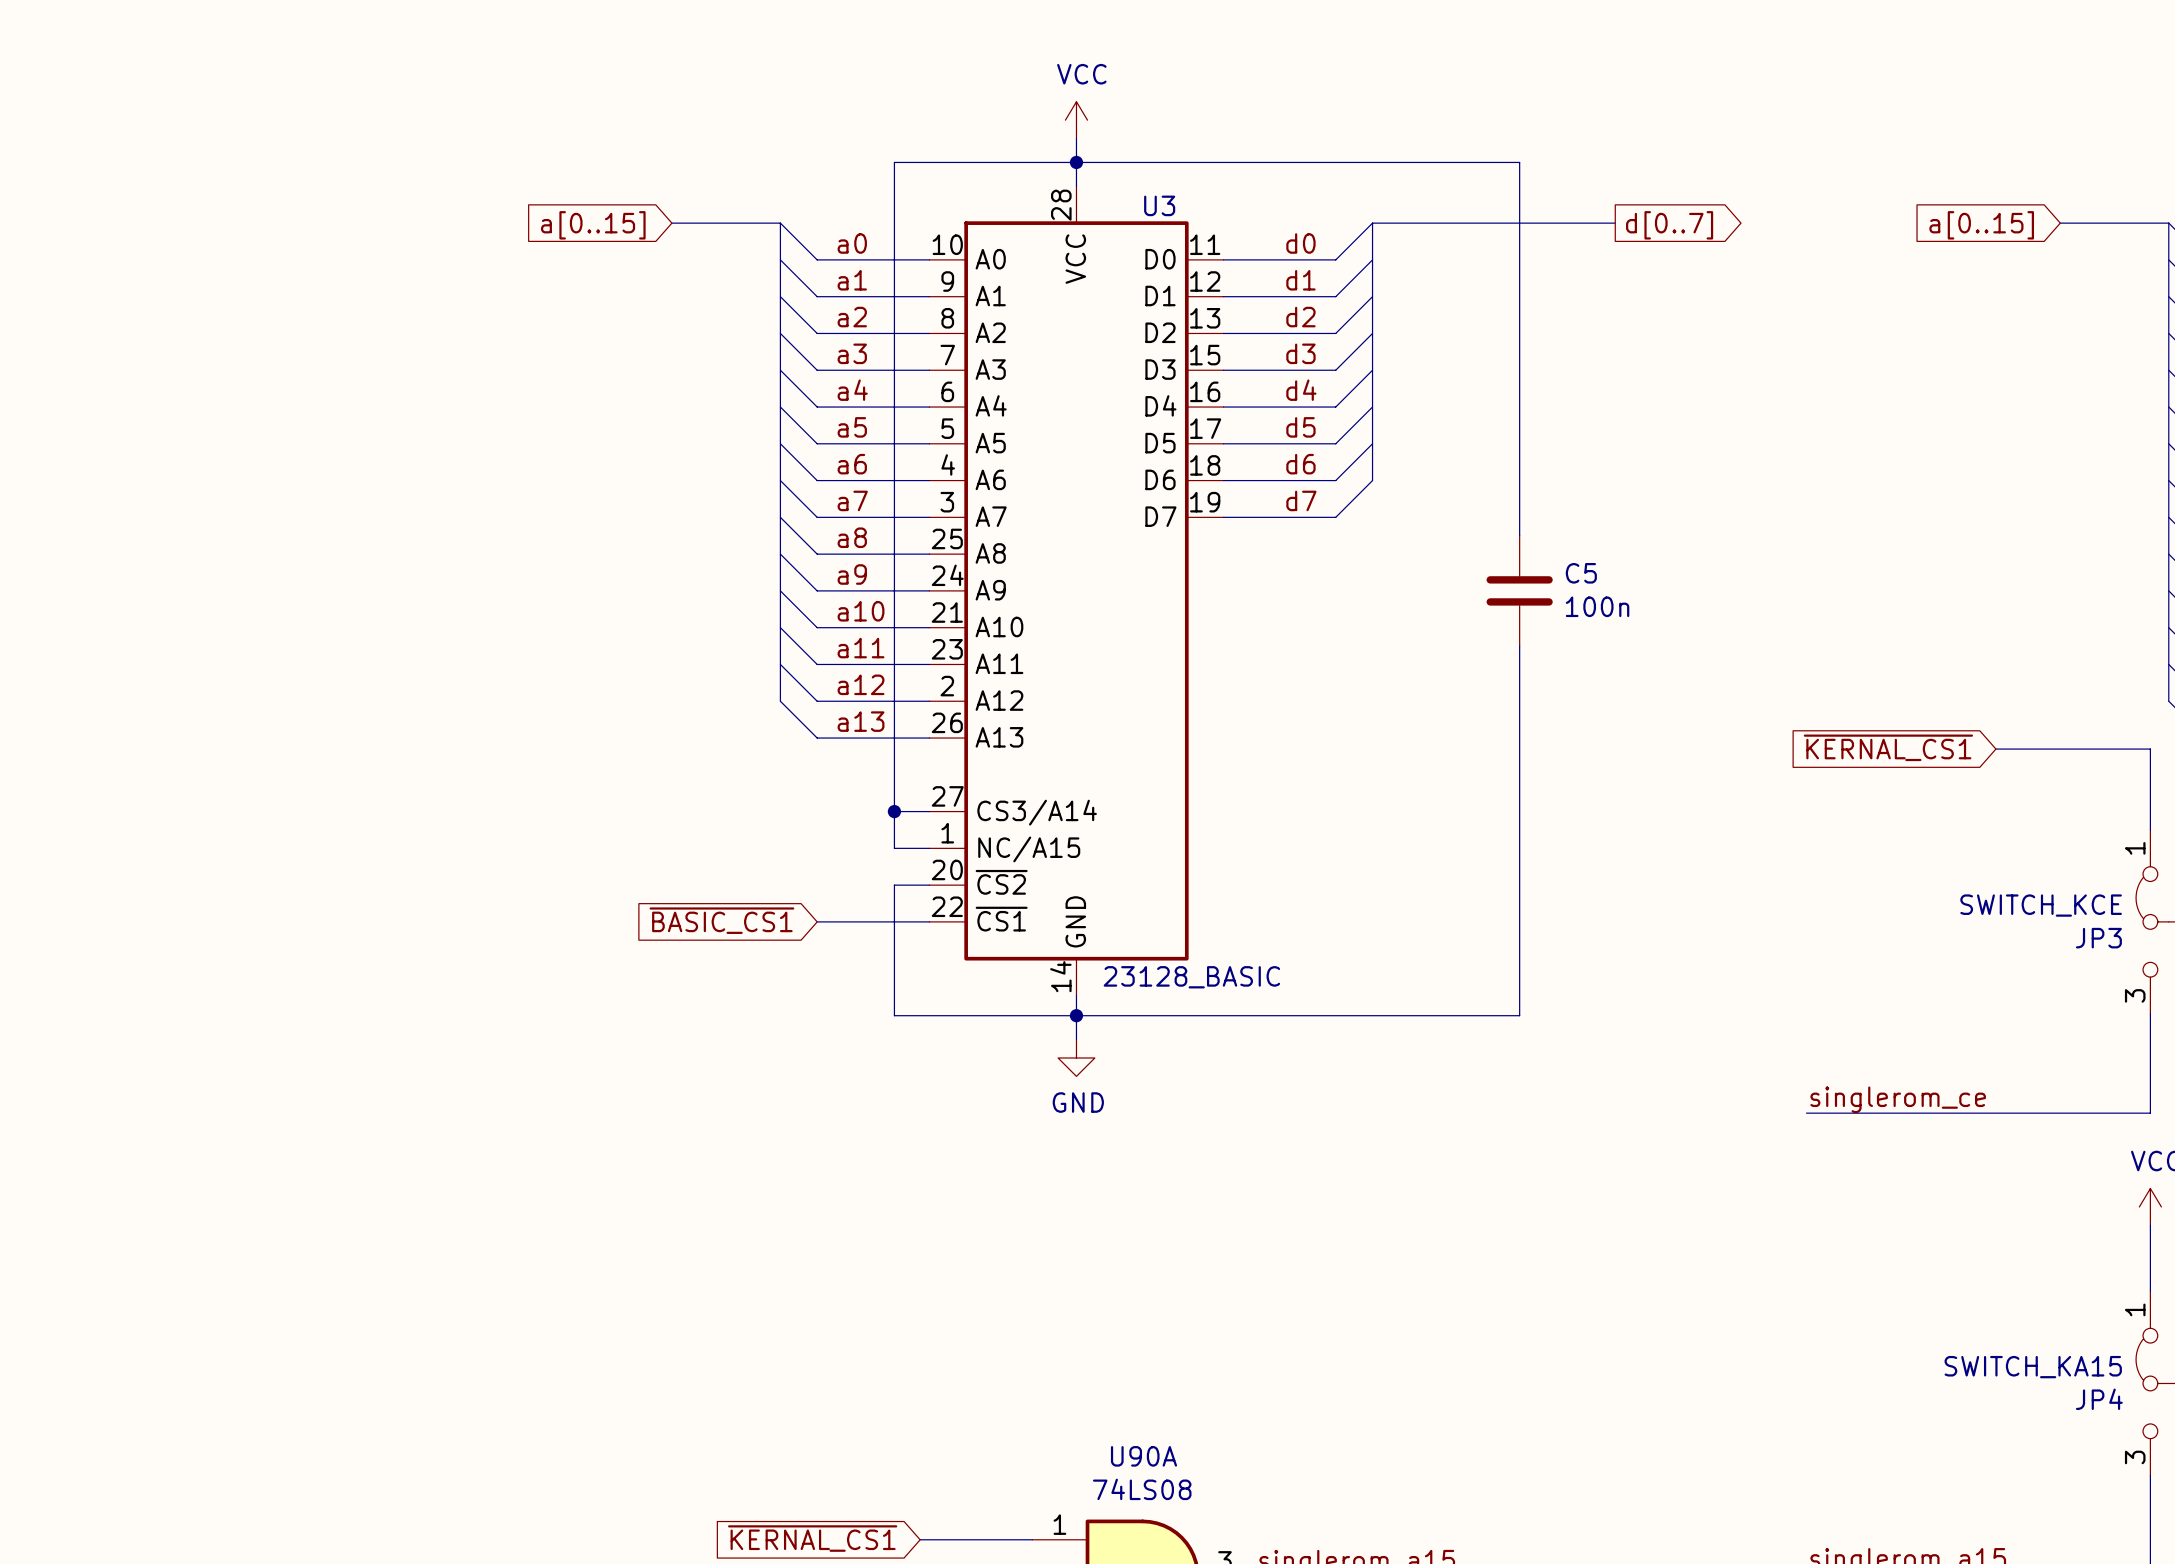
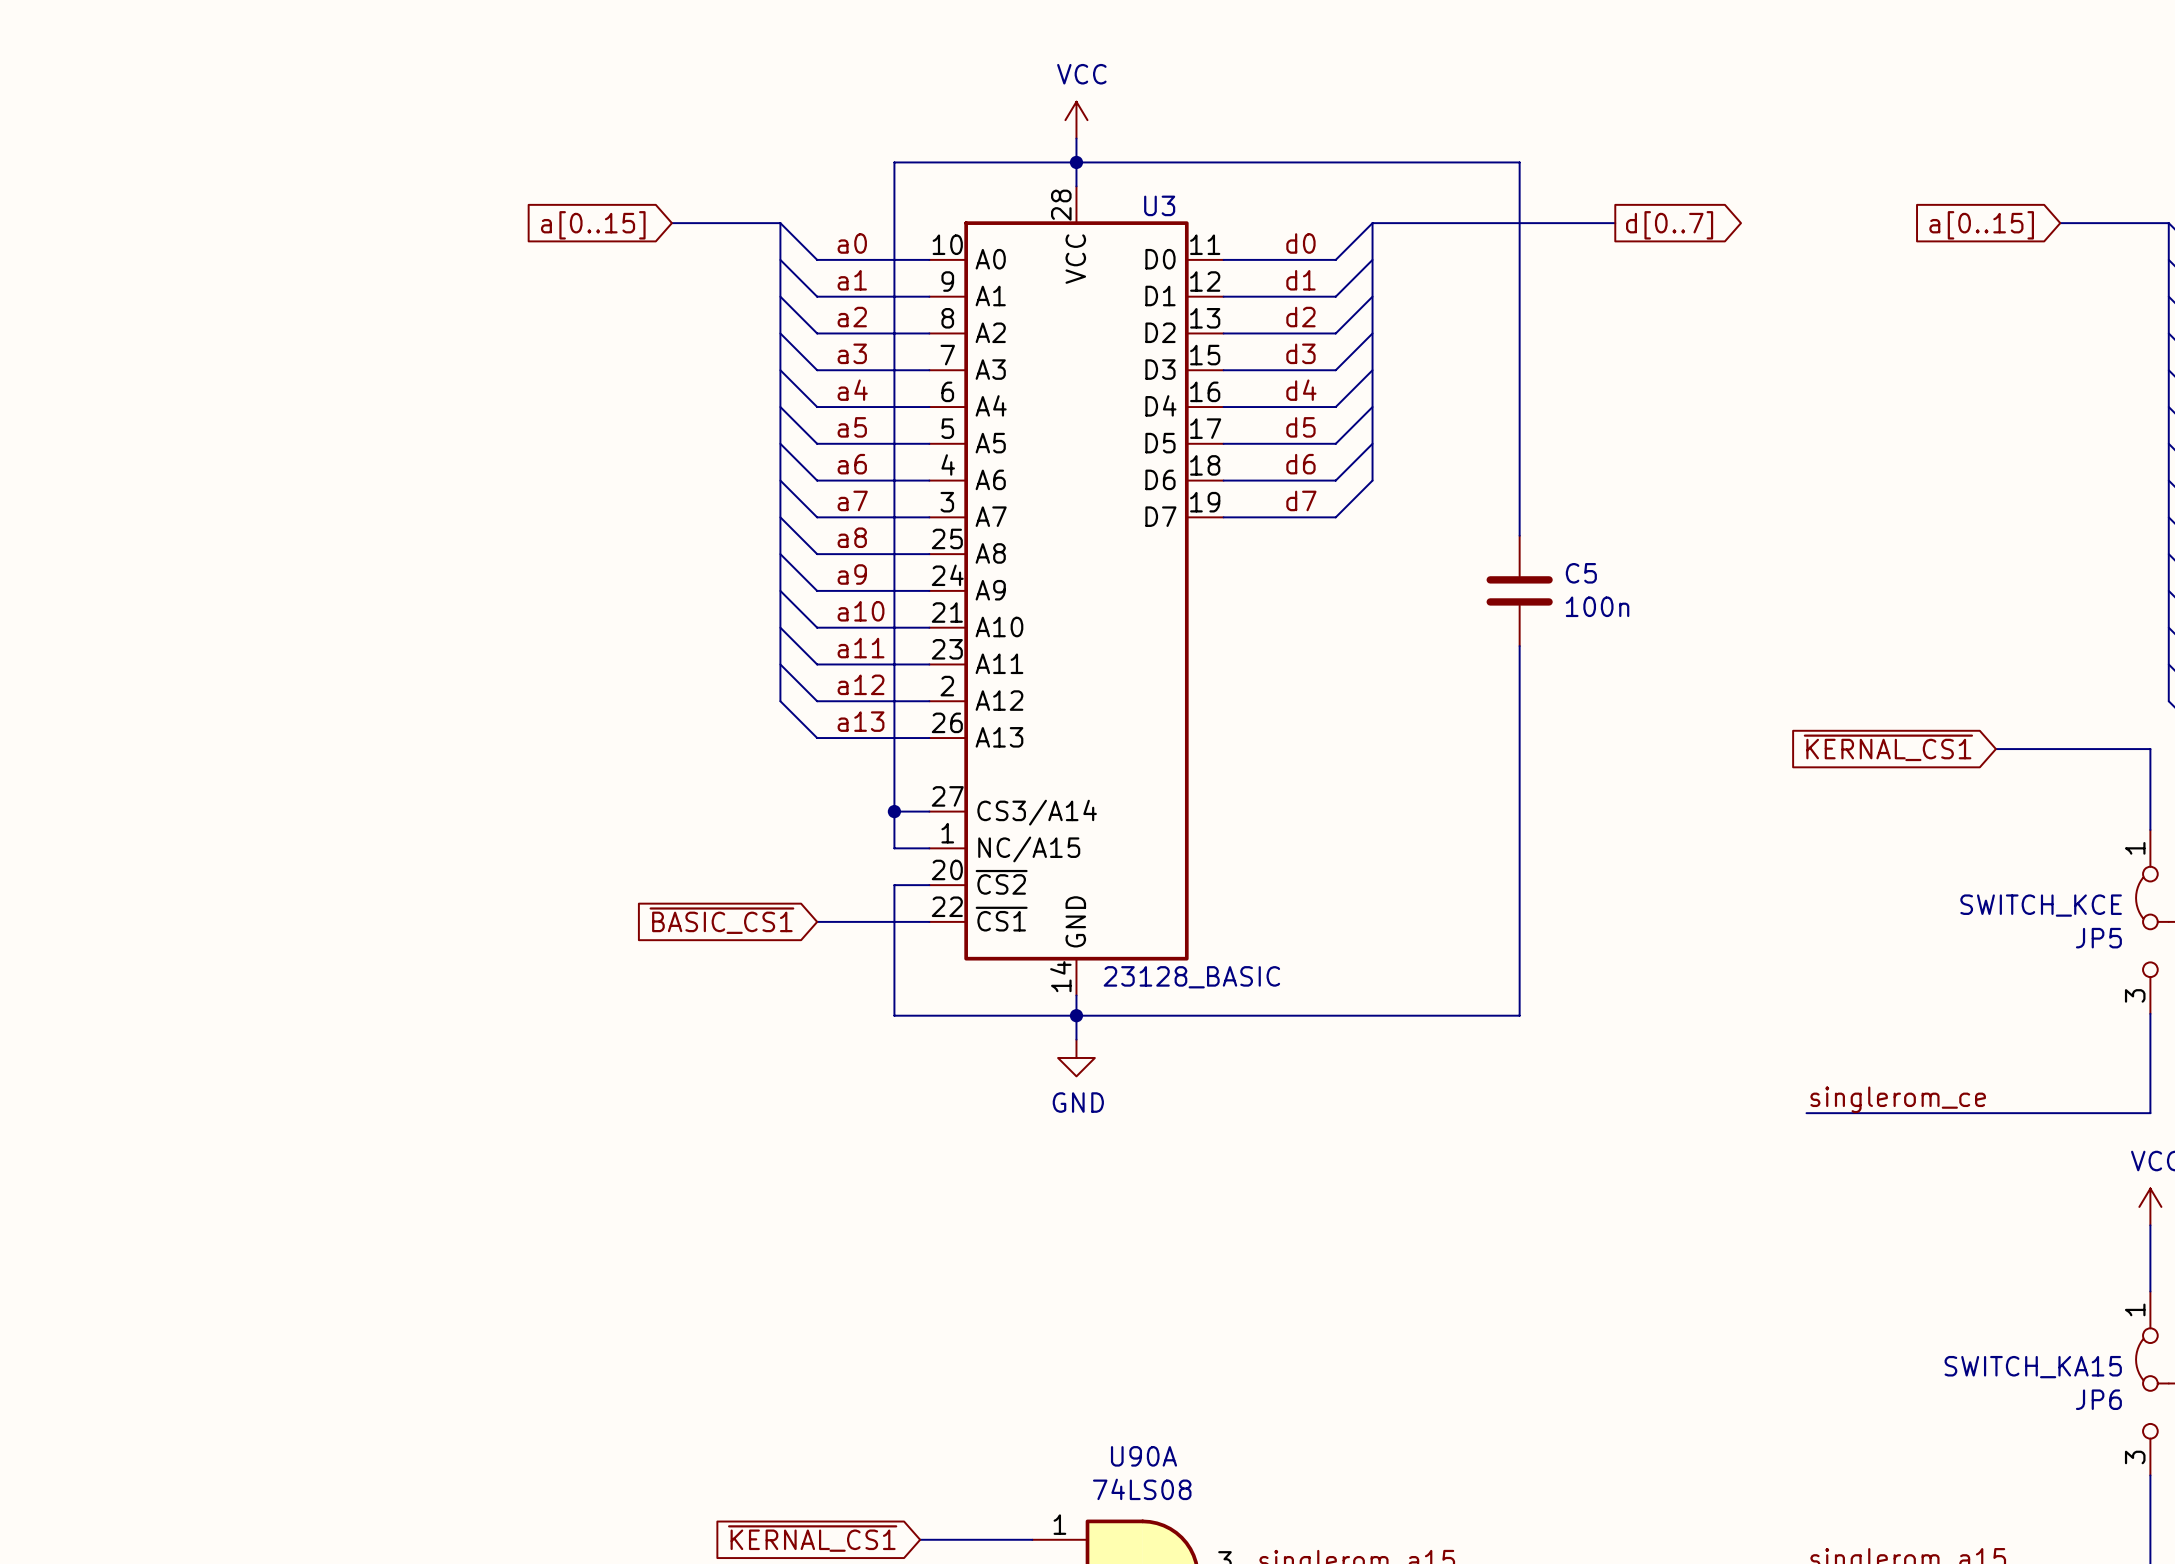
JP3 name: JP3 (2098, 938) -> JP5 (2098, 938)
JP4 name: JP4 (2099, 1399) -> JP6 (2098, 1399)

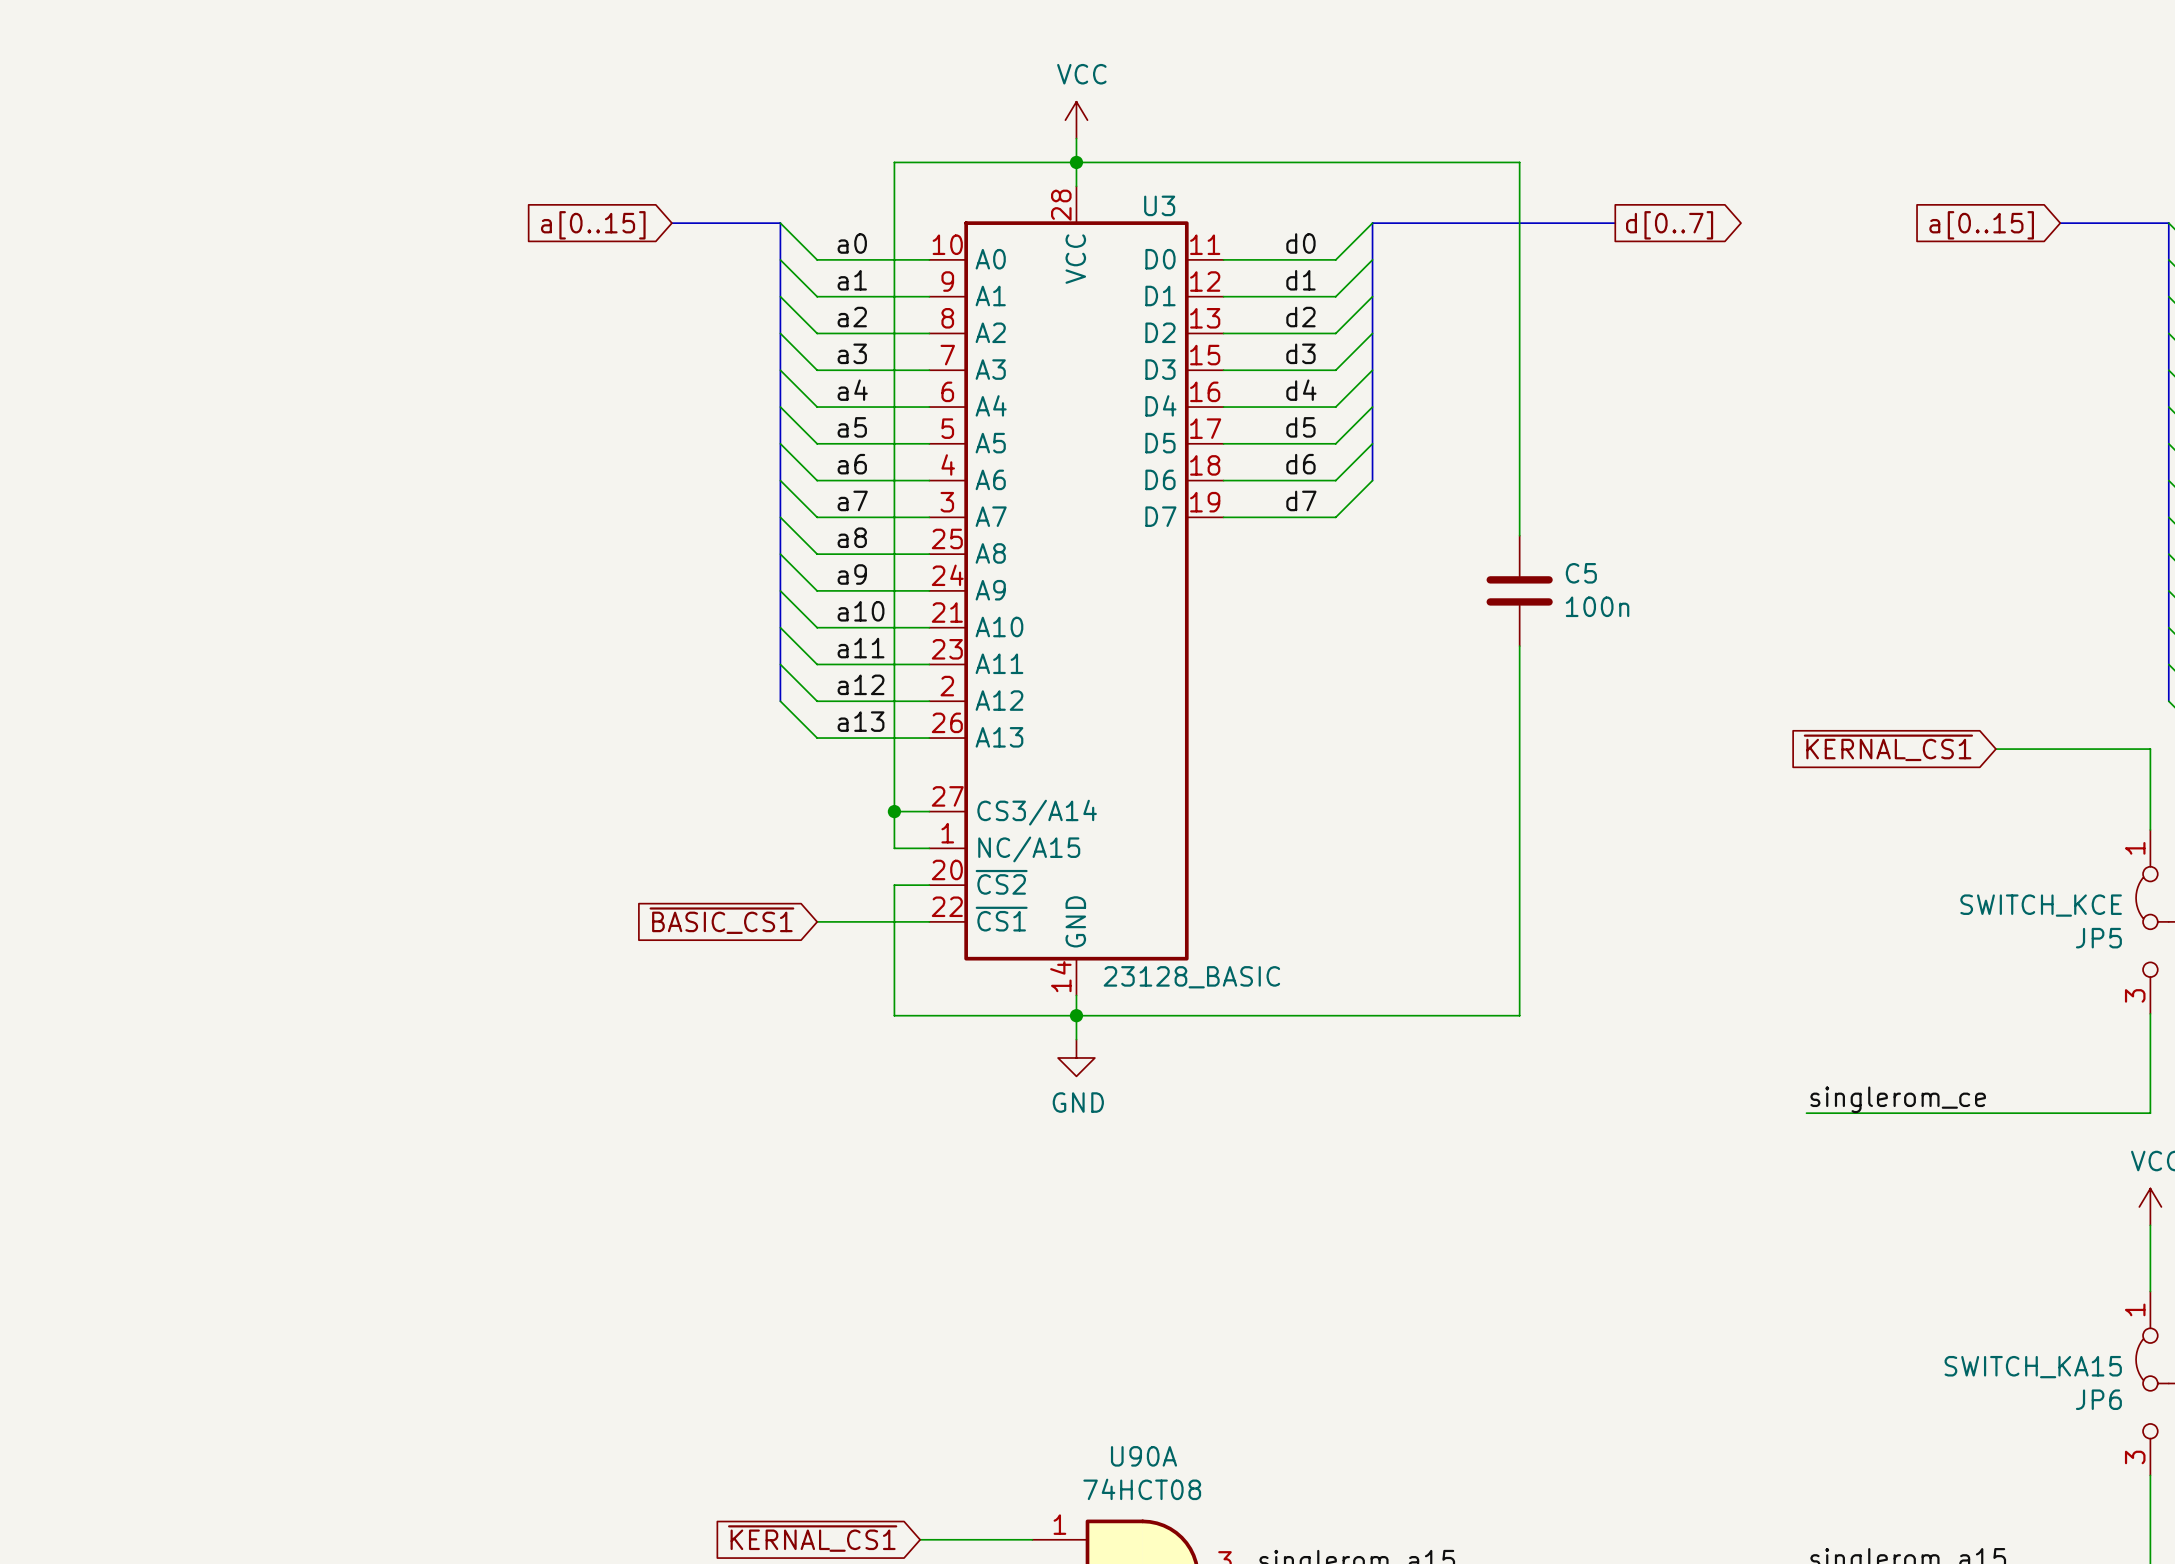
U90A value: 74LS08 (1142, 1489) -> 74HCT08 (1142, 1489)

